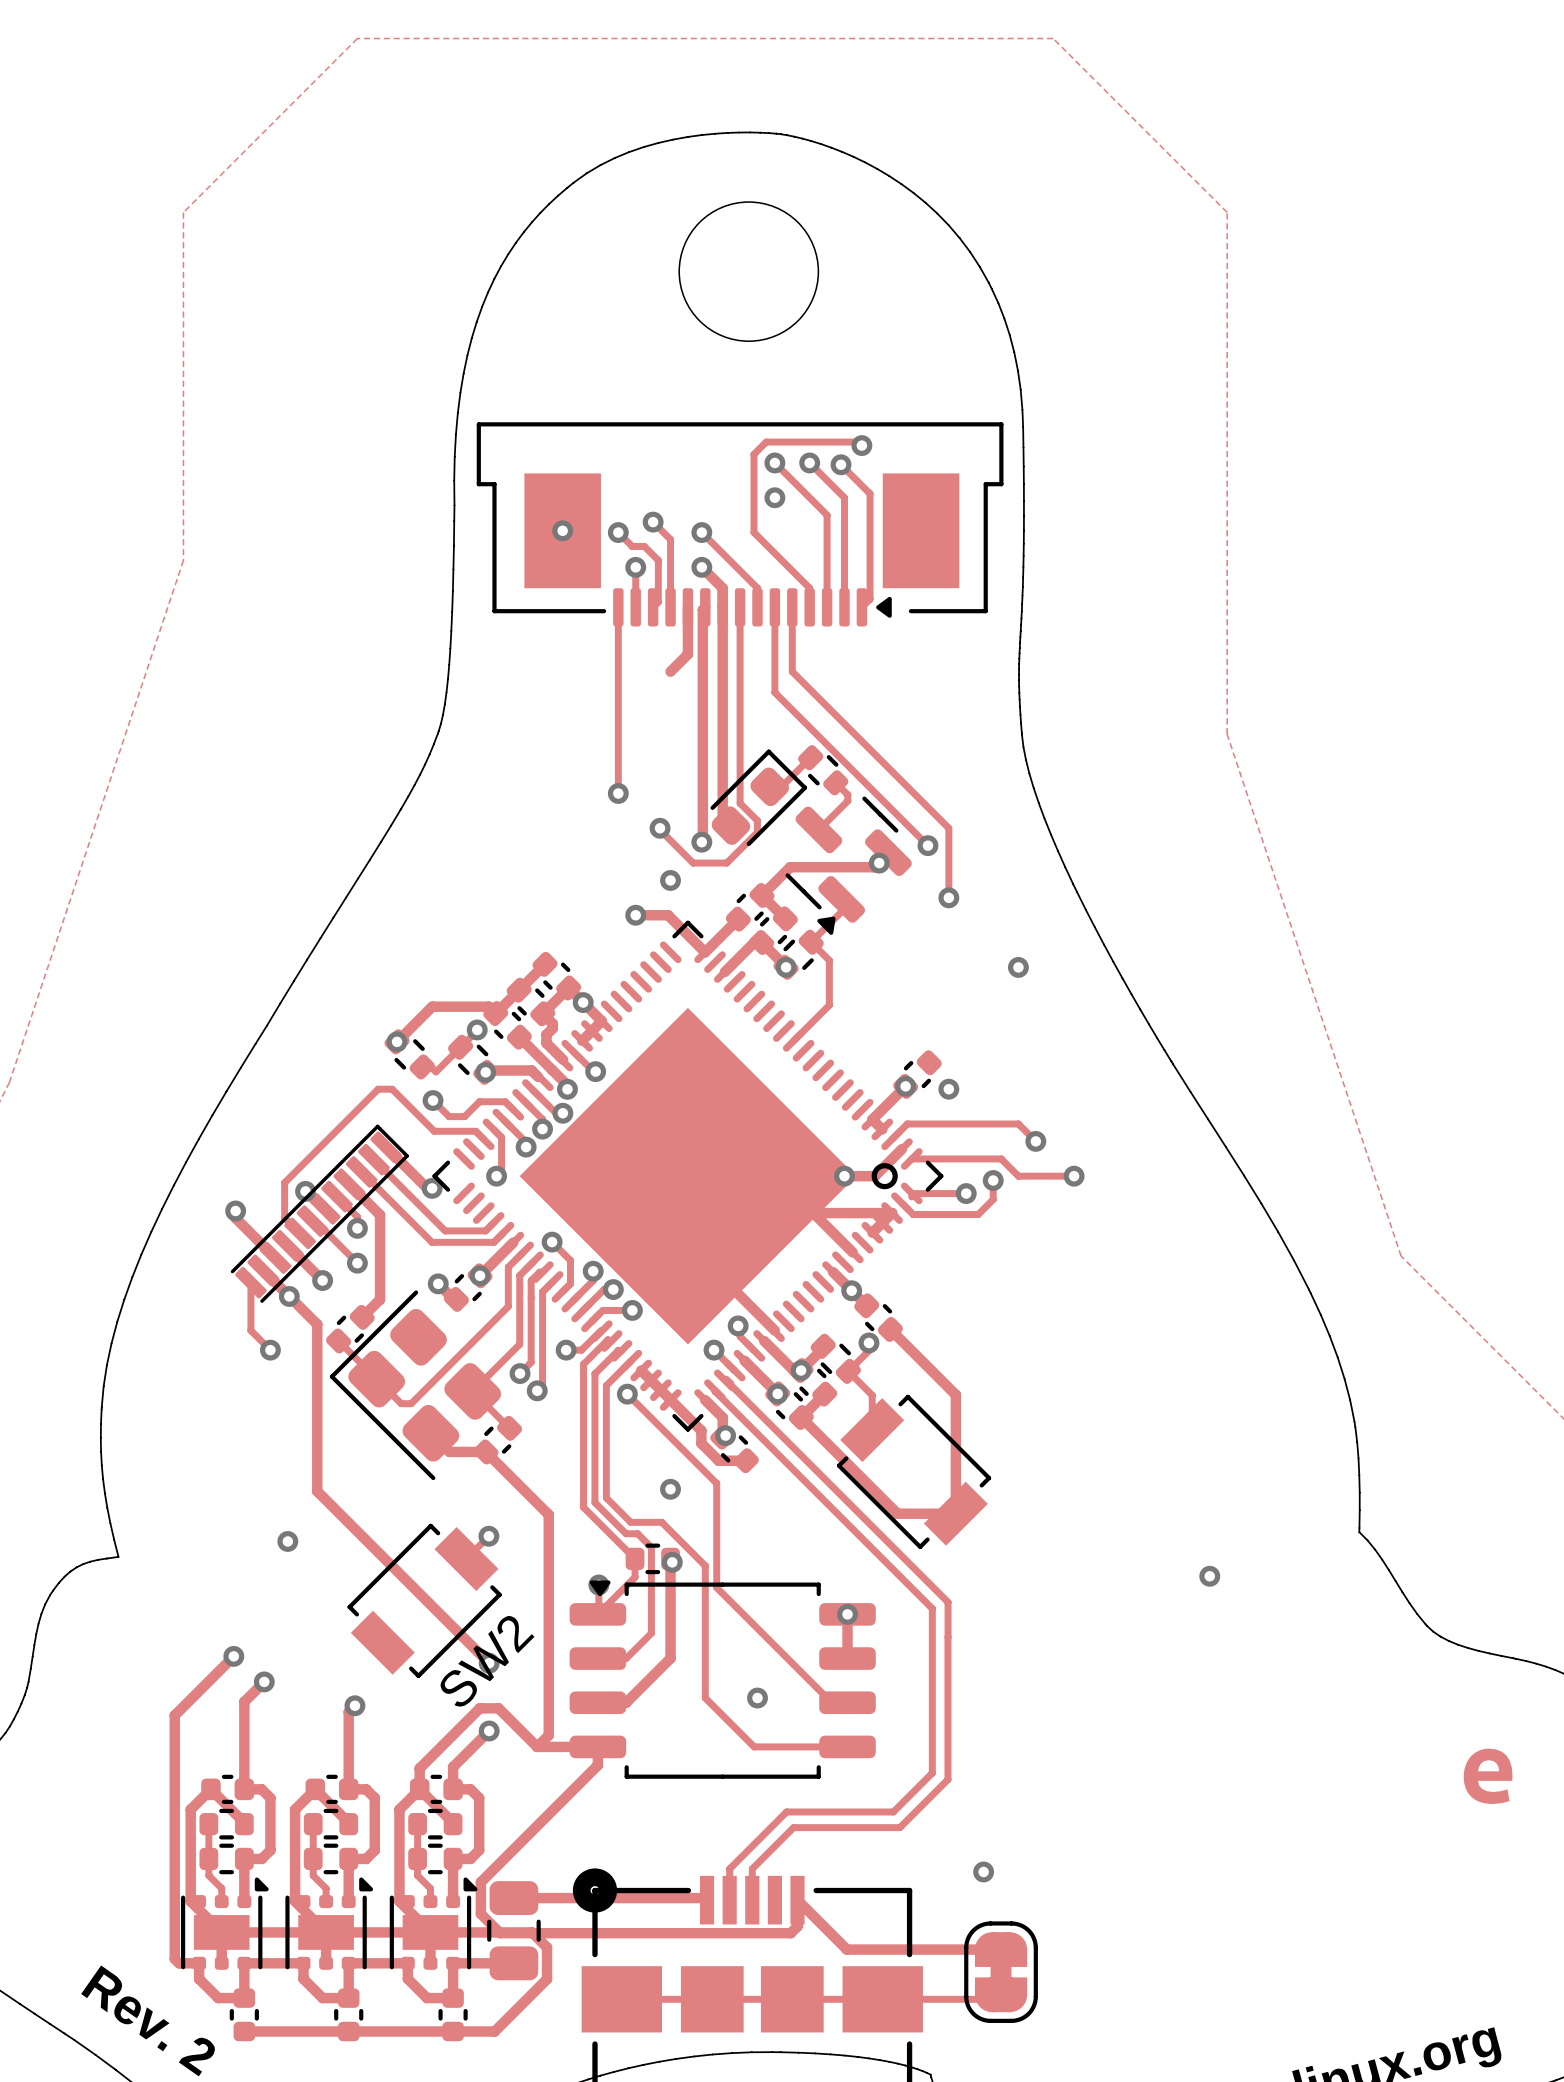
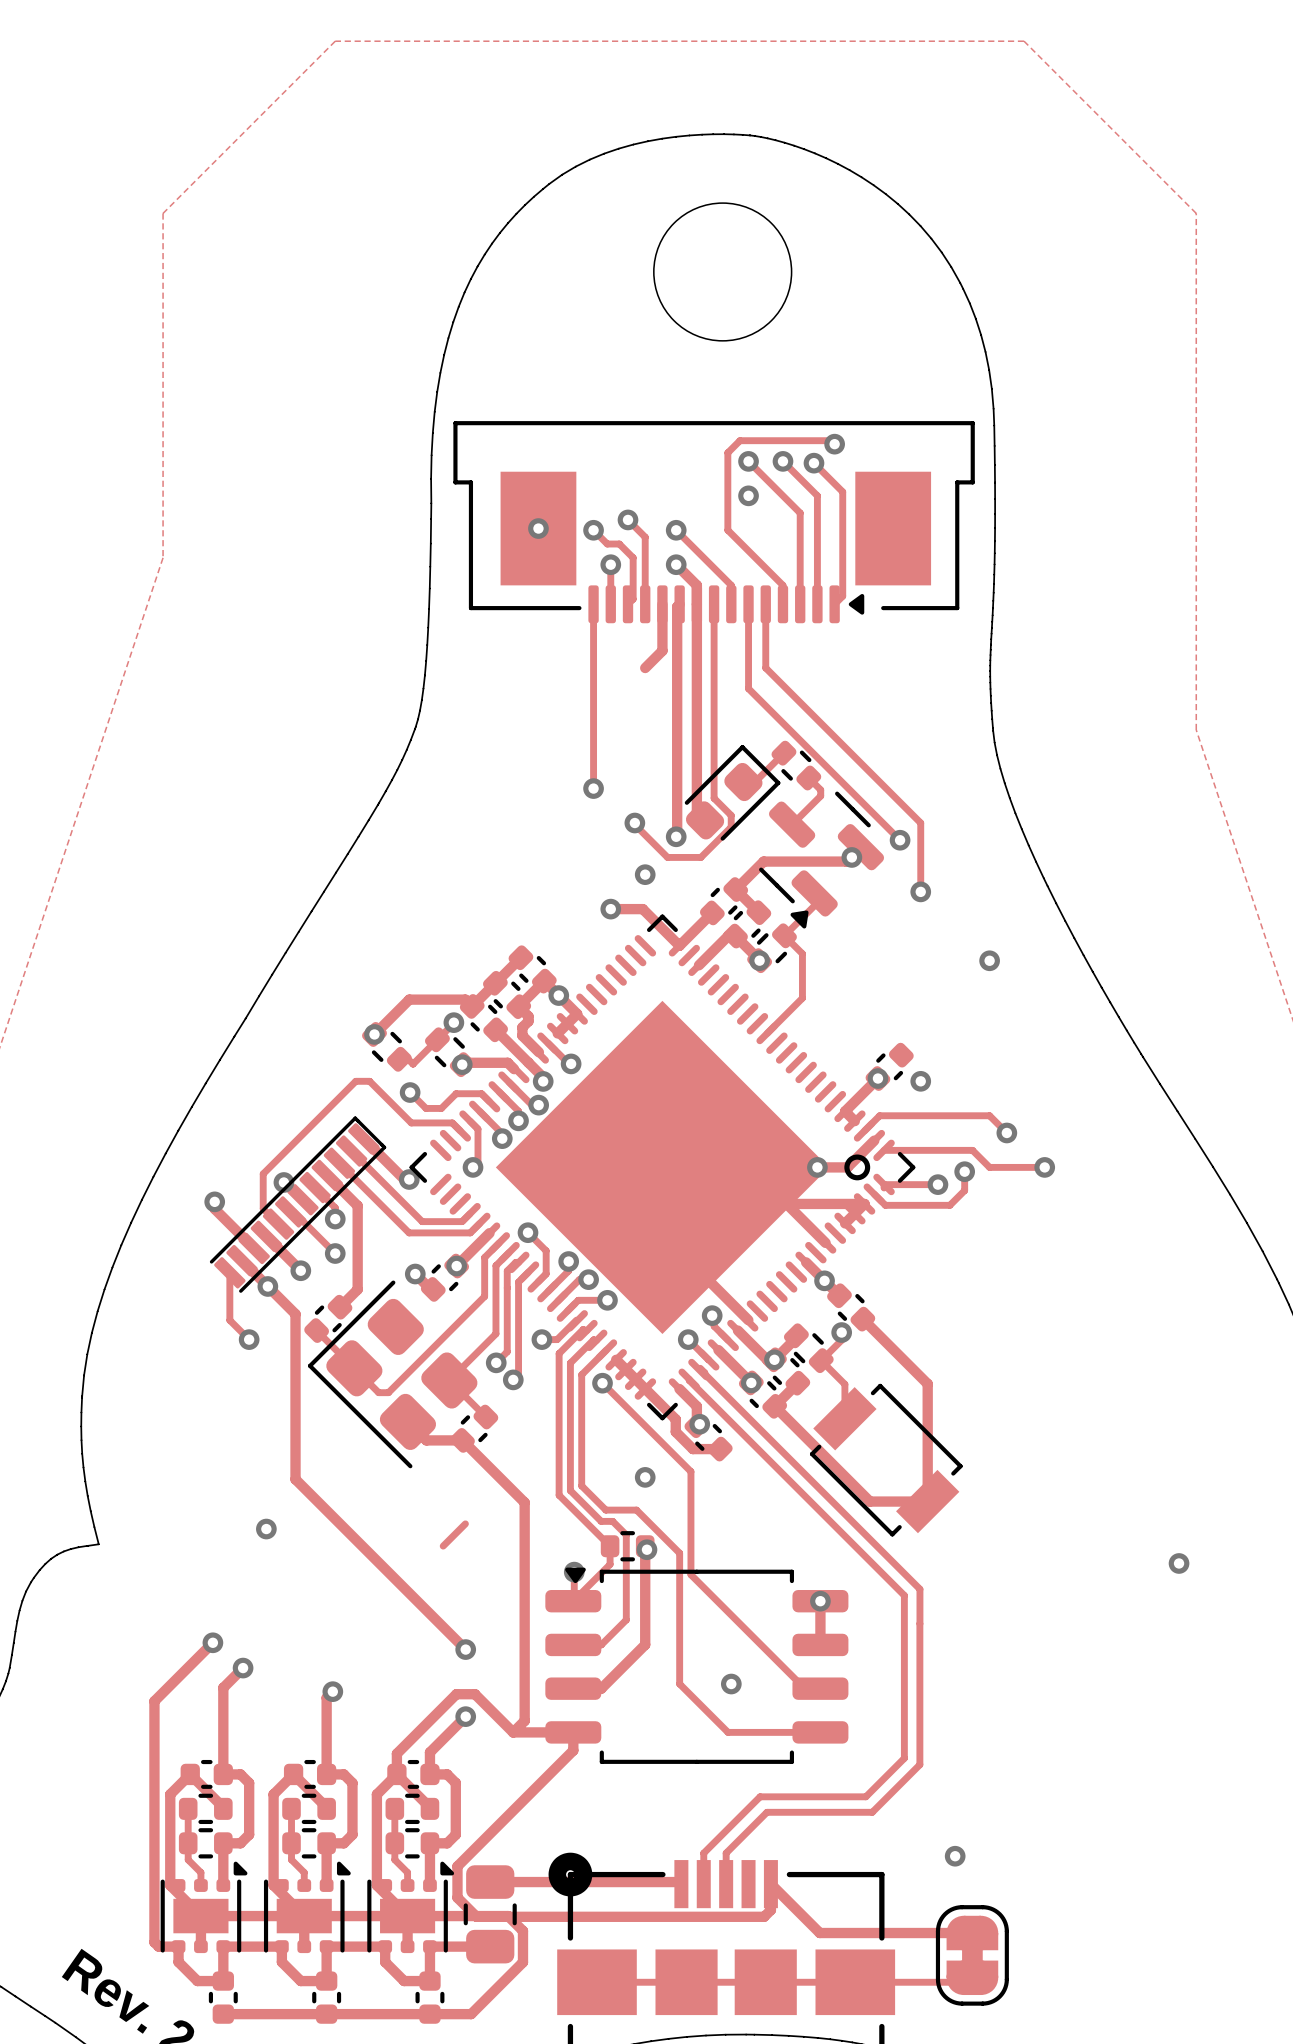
via: (488, 1536) -> none
SW2: (424, 1600) -> none

